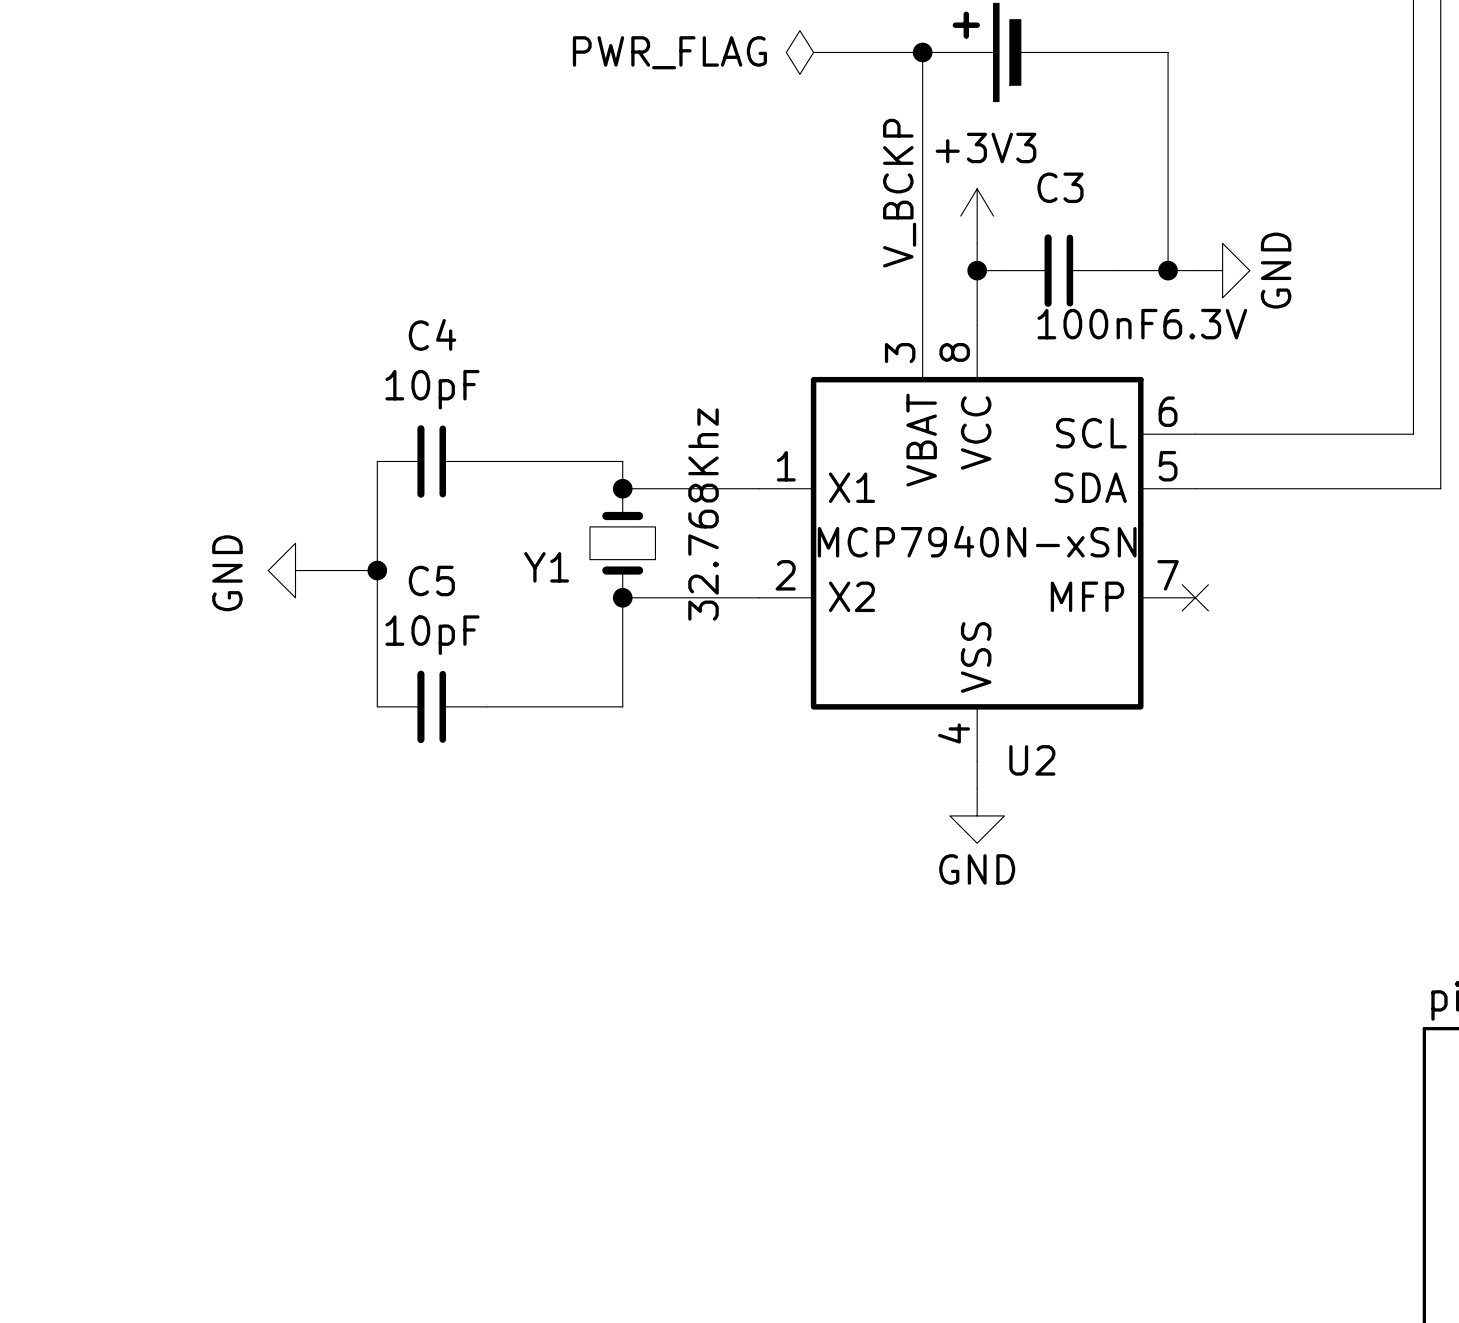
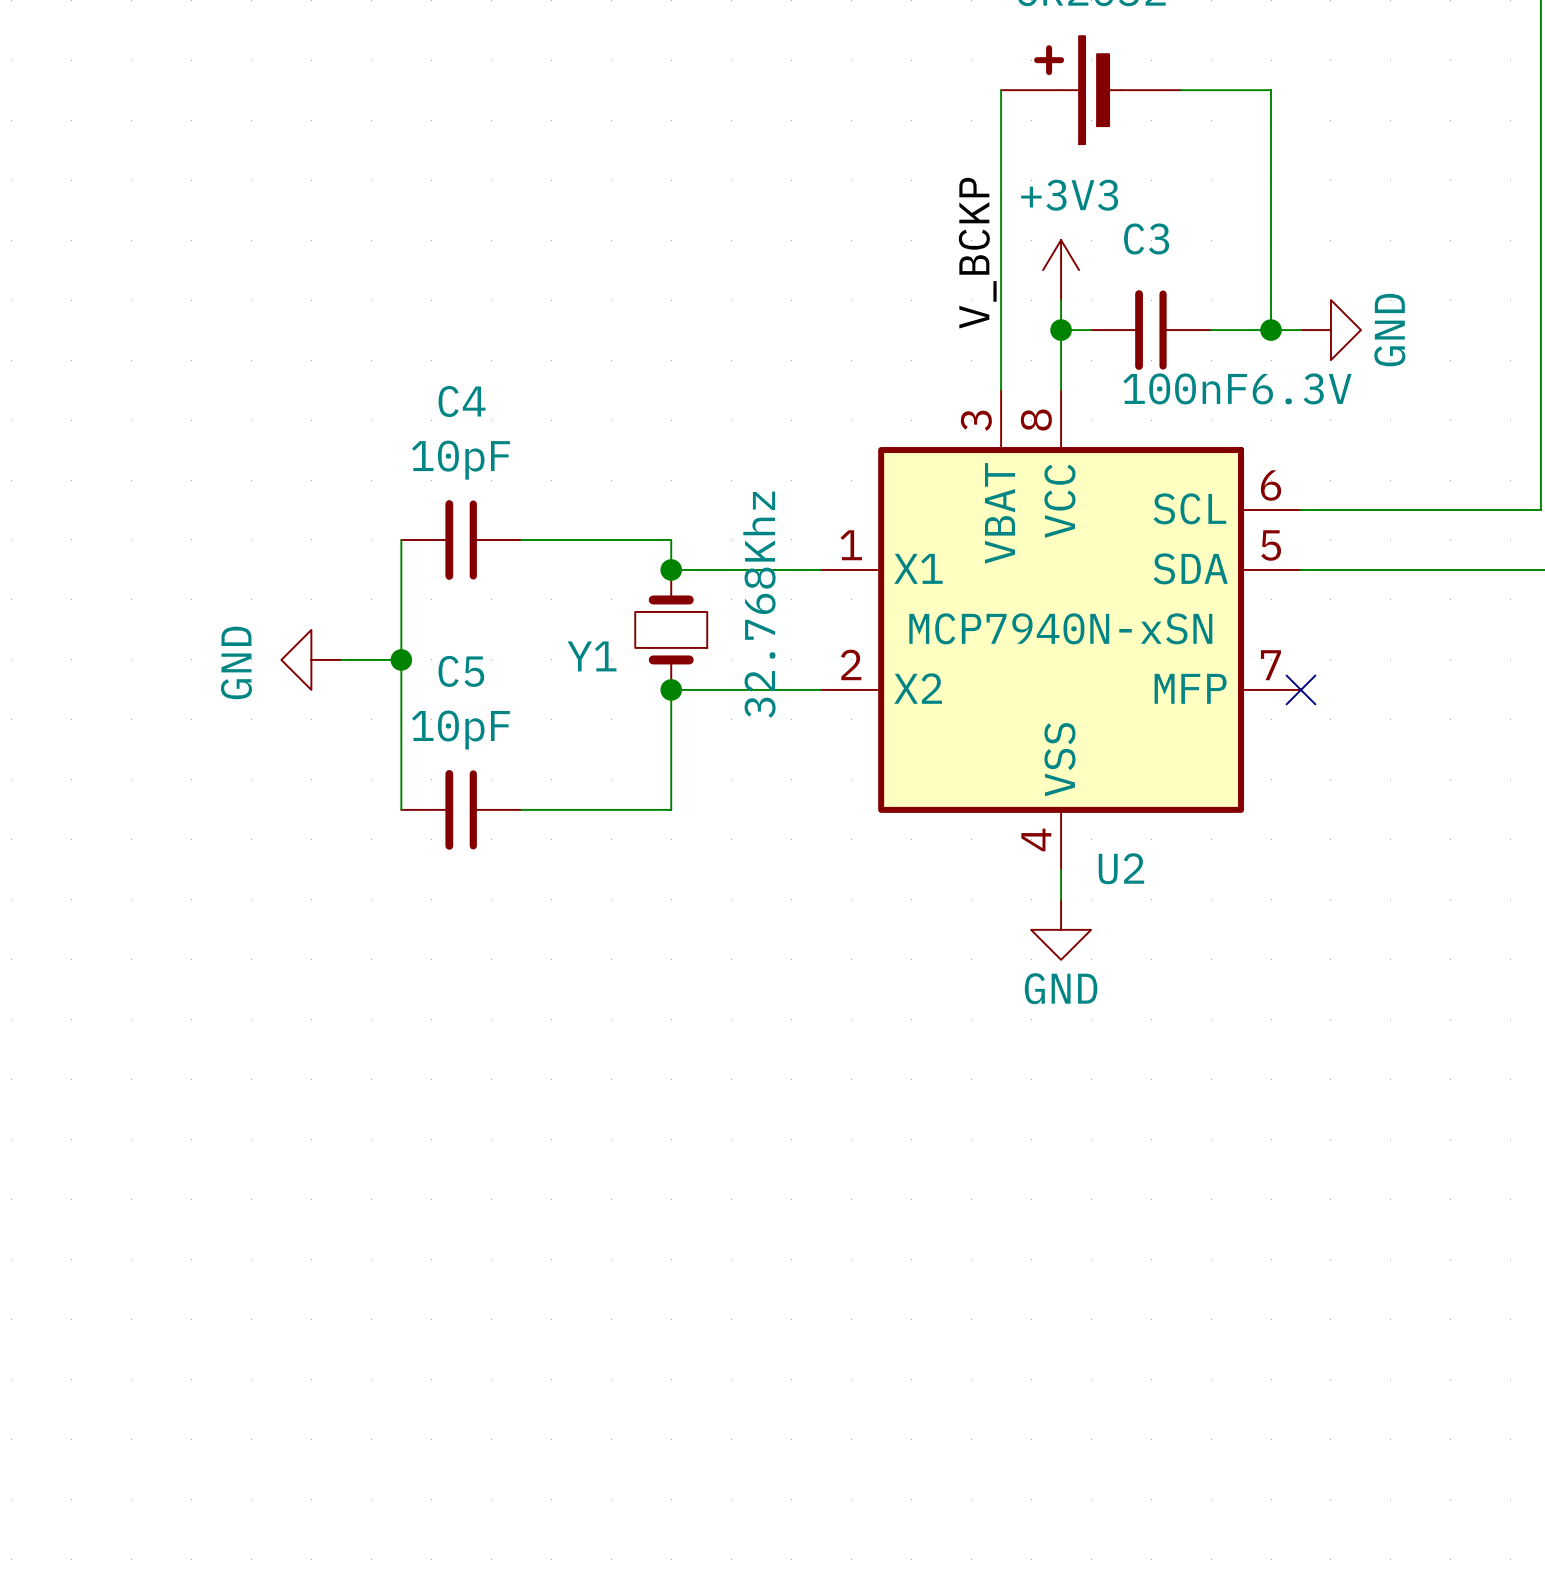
power symbol: PWR_FLAG (813, 52) -> none
wire: (840, 52) (922, 52) -> none
junction: (922, 52) -> none

